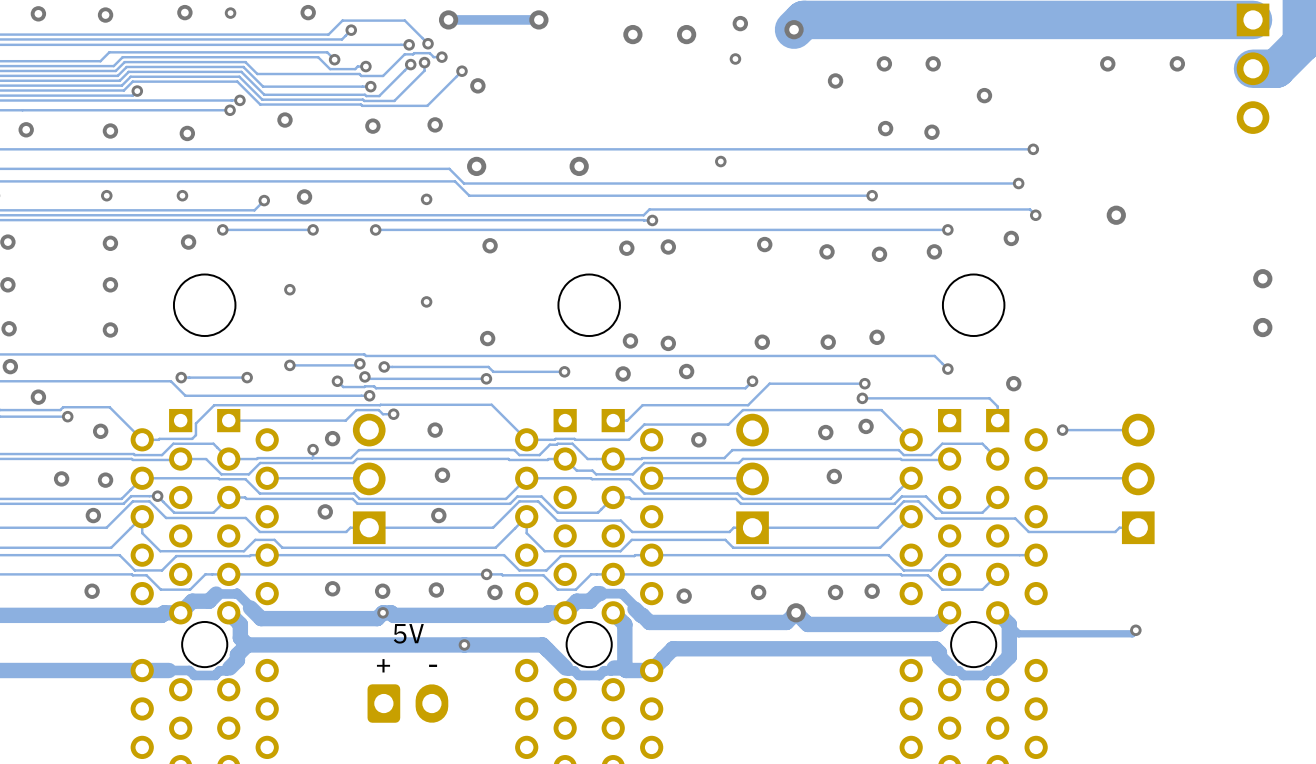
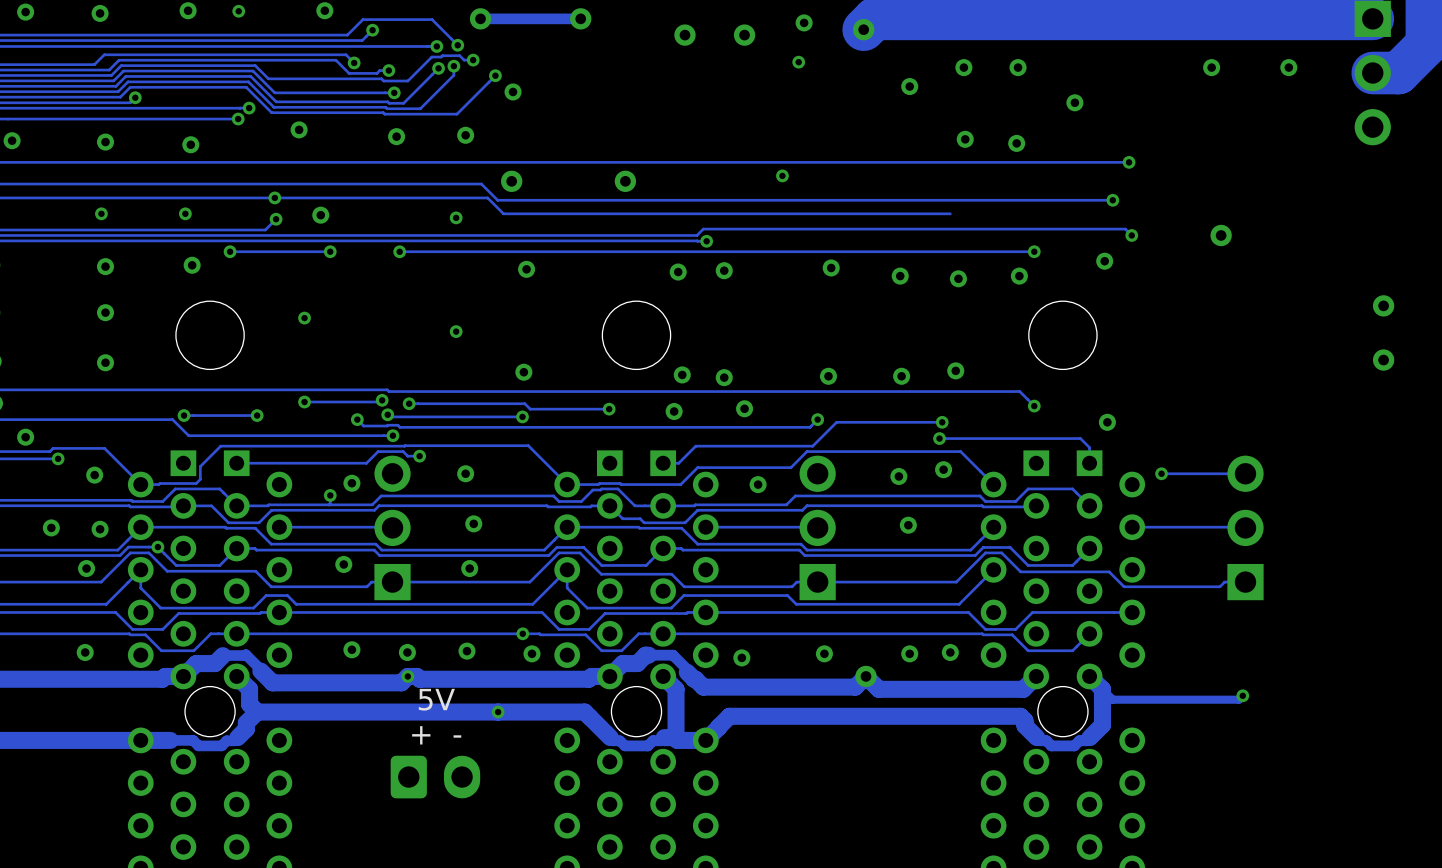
via: none -> (274, 197)
via: (872, 195) -> none

